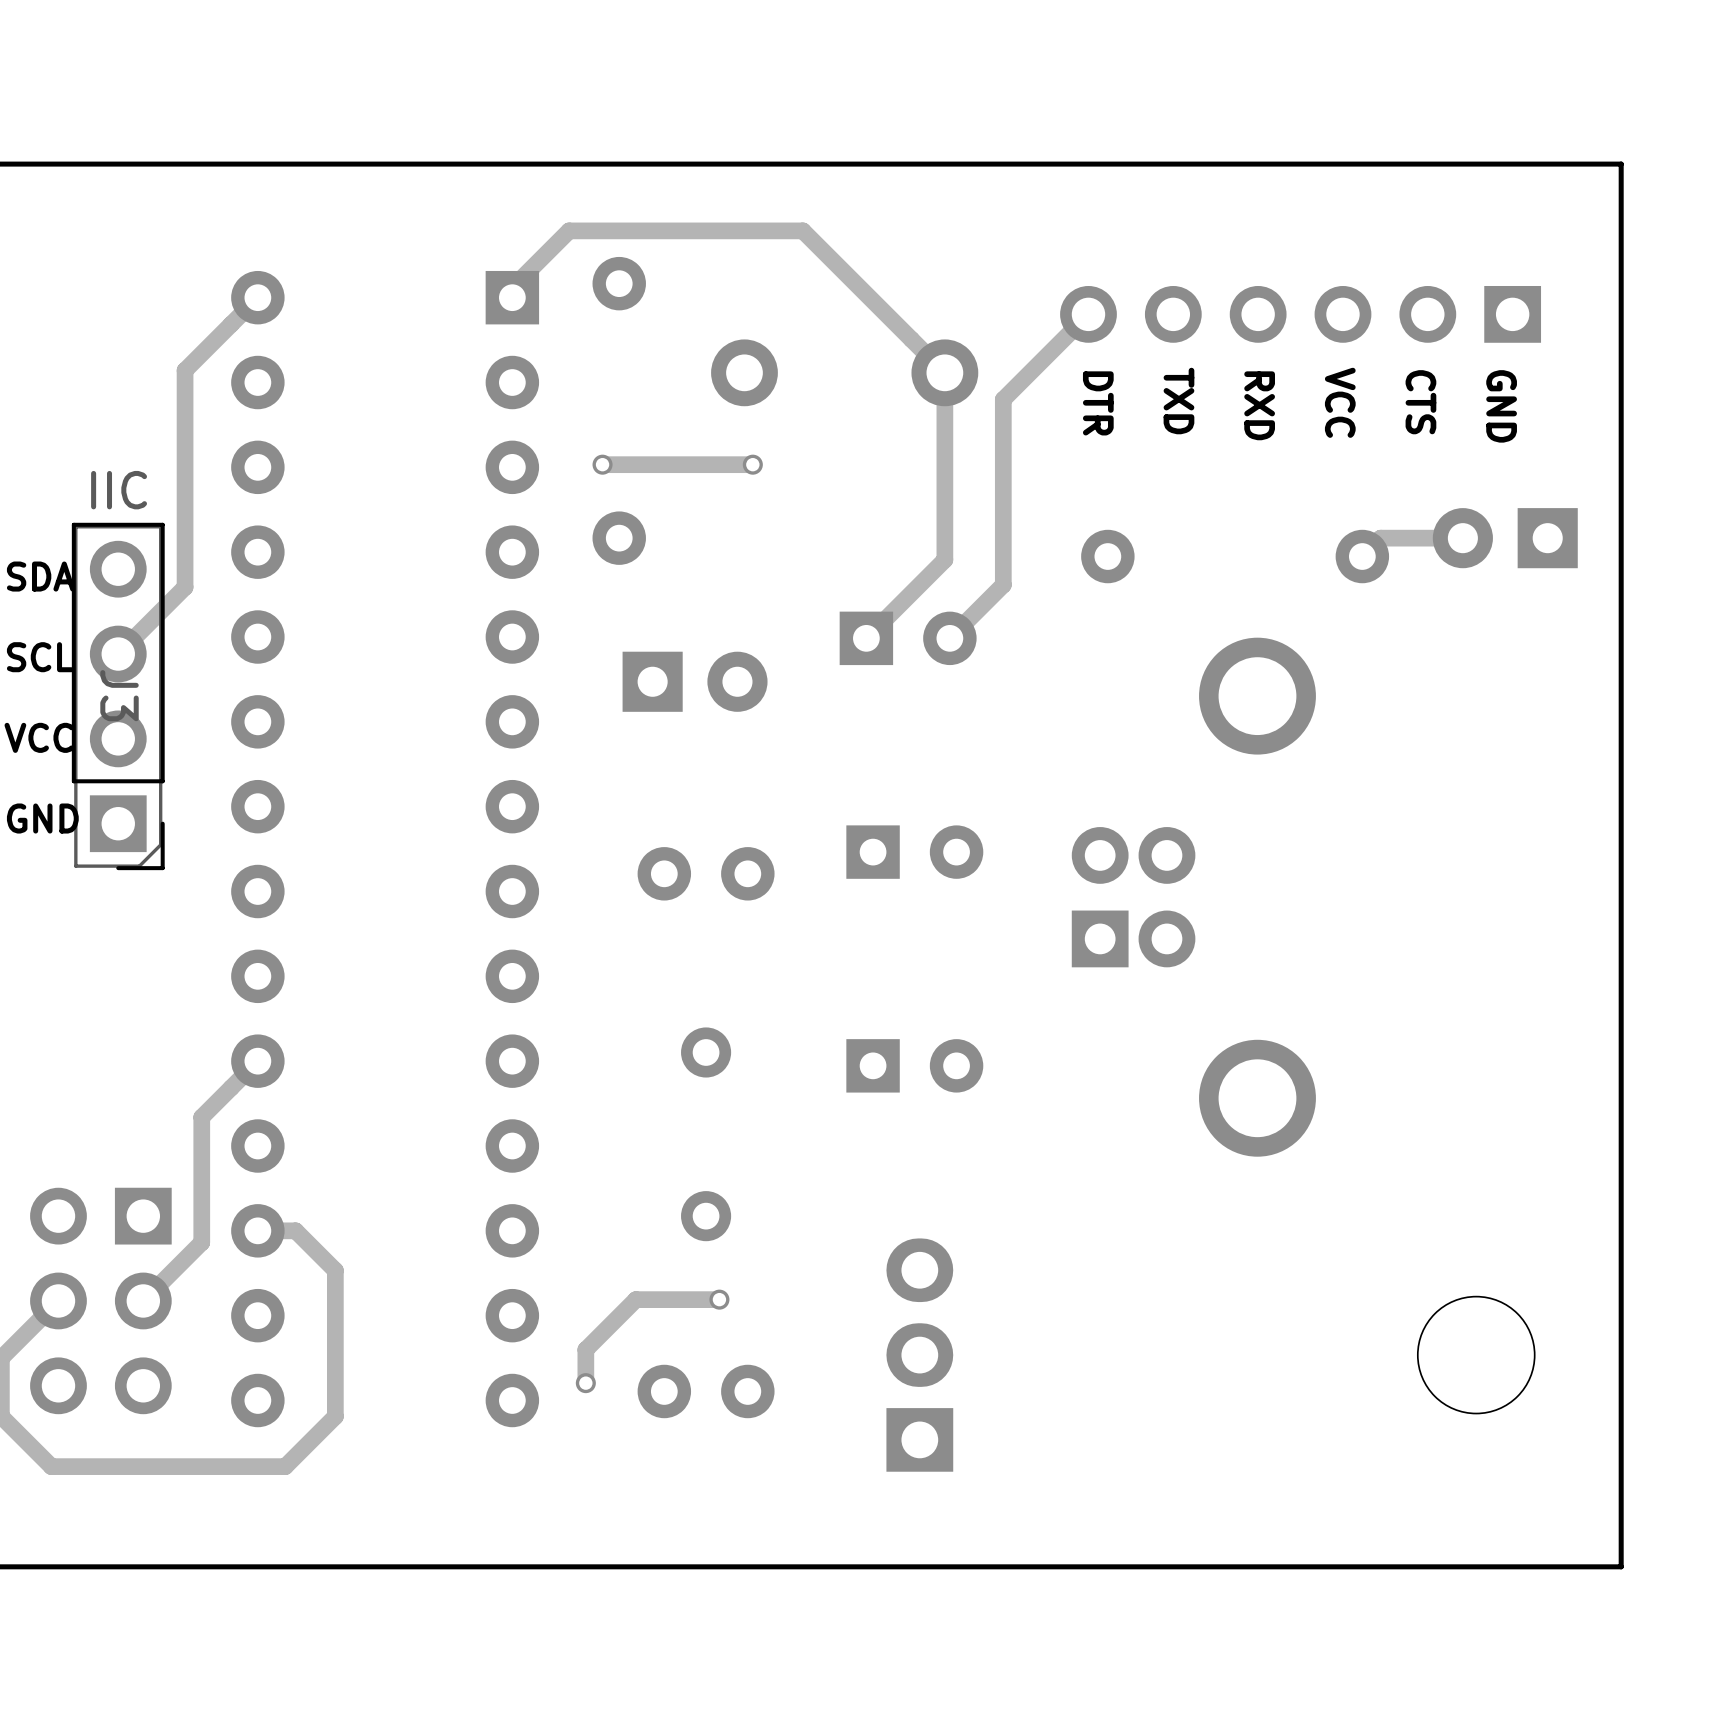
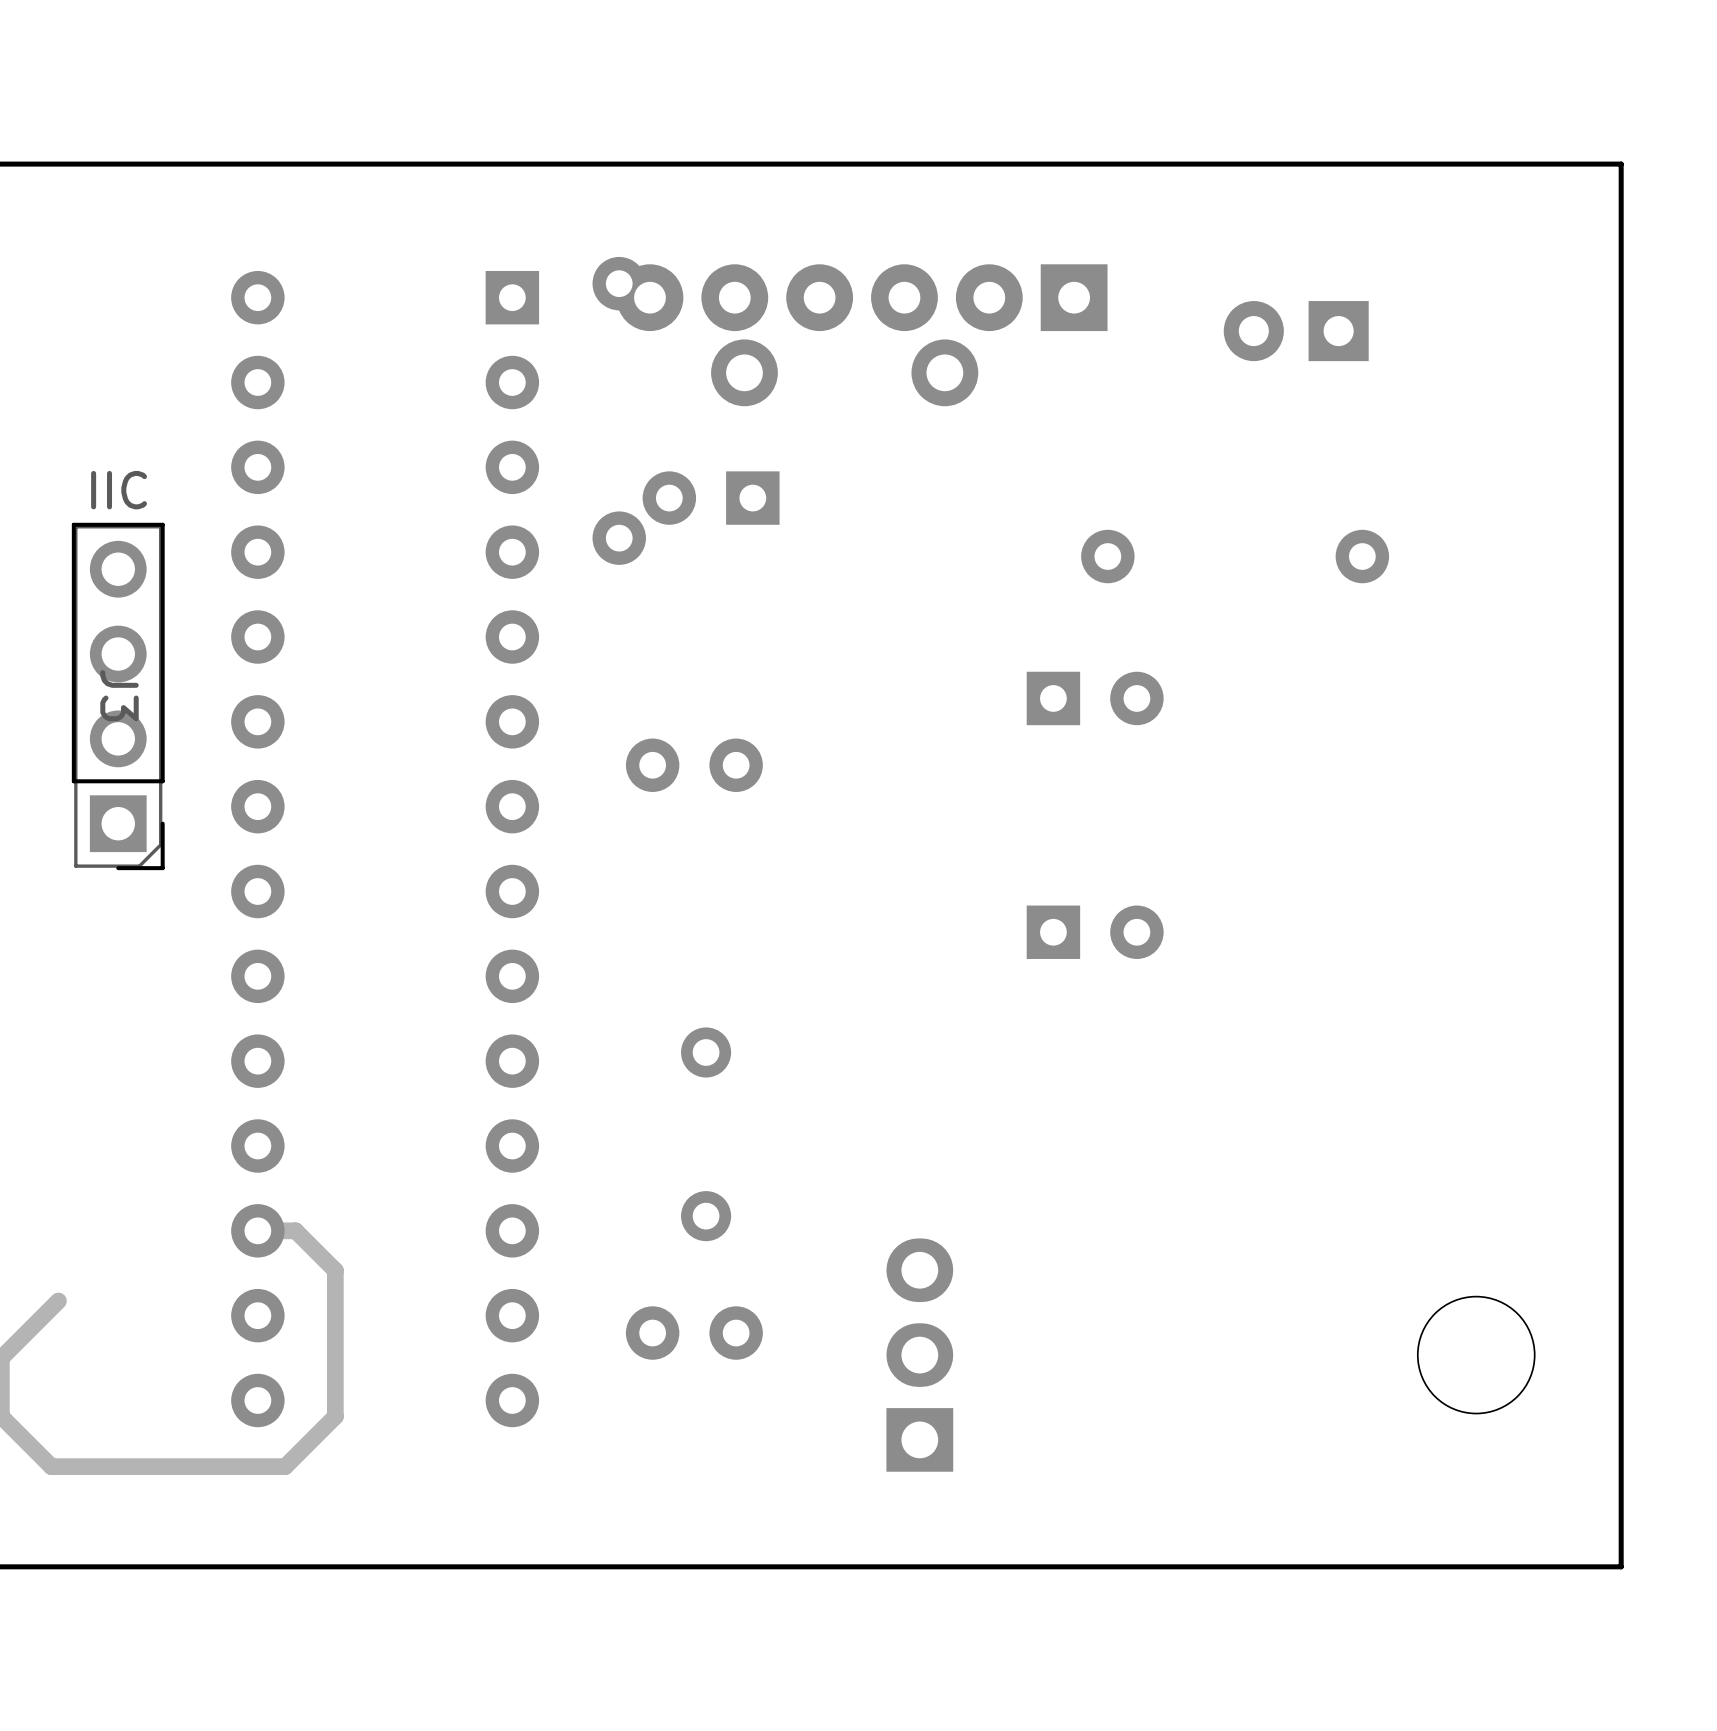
part footprint: [1060, 285, 1542, 343] -> [1223, 301, 1369, 362]
track: (257, 297) (185, 370) (185, 587) (118, 654) -> none
track: (512, 297) (512, 287) (569, 230) (802, 230) (944, 372) (944, 559) (866, 638) -> none
part: none -> (862, 297)
track: (1088, 314) (1003, 399) (1003, 584) (949, 638) -> none
text: TXD (1178, 401) -> none
text: VCC (1340, 402) -> none
text: CTS (1420, 402) -> none
text: DTR (1098, 403) -> none
text: RXD (1259, 405) -> none
text: GND (1501, 406) -> none
via: (602, 464) -> none
track: (752, 464) (602, 464) -> none
via: (752, 464) -> none
part: none -> (711, 498)
track: (1462, 538) (1380, 538) (1362, 556) -> none
part: (1505, 538) -> none
text: SDA (41, 576) -> none
part: (908, 638) -> none
text: SCL (40, 657) -> none
part: (695, 681) -> none
part: none -> (1095, 698)
text: VCC (39, 737) -> none
text: GND (42, 818) -> none
part: (914, 852) -> none
part position: (706, 873) -> (694, 765)
part: (1193, 897) -> none
part: none -> (1095, 932)
track: (257, 1061) (201, 1117) (201, 1242) (143, 1300) -> none
part: (914, 1065) -> none
track: (719, 1299) (635, 1299) (585, 1349) (585, 1383) -> none
via: (719, 1299) -> none
part: (100, 1300) -> none
via: (585, 1383) -> none
part position: (706, 1391) -> (694, 1333)

